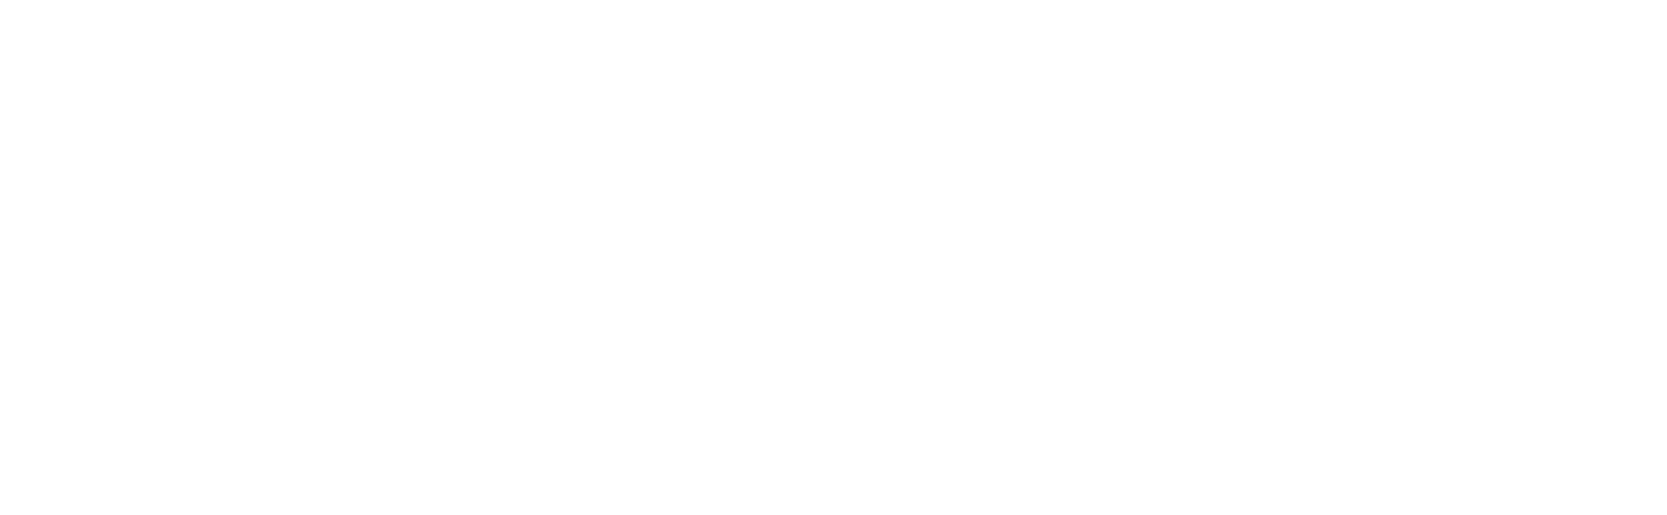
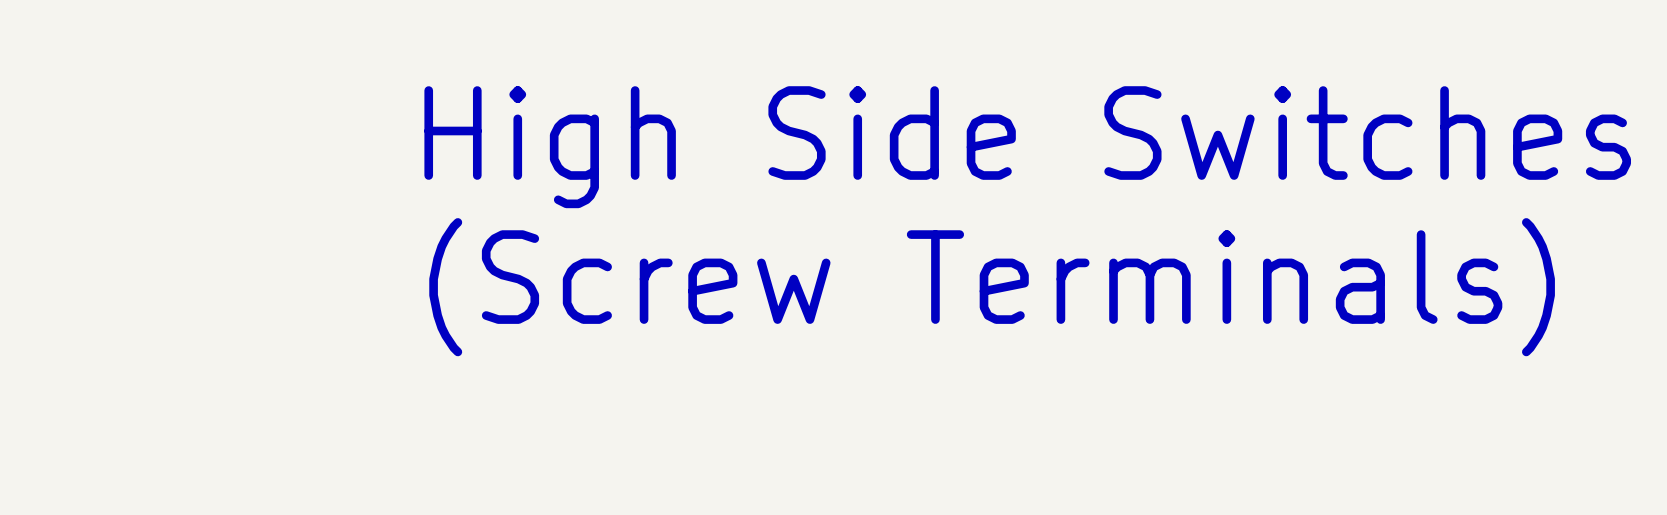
text: none -> High Side Switches (1027, 147)
text: none -> (Screw Terminals) (992, 287)

